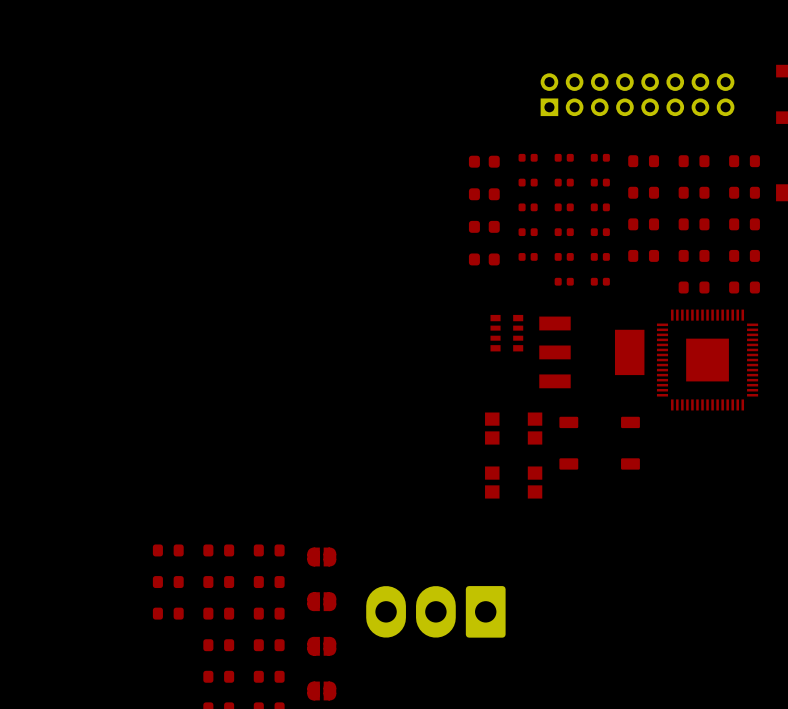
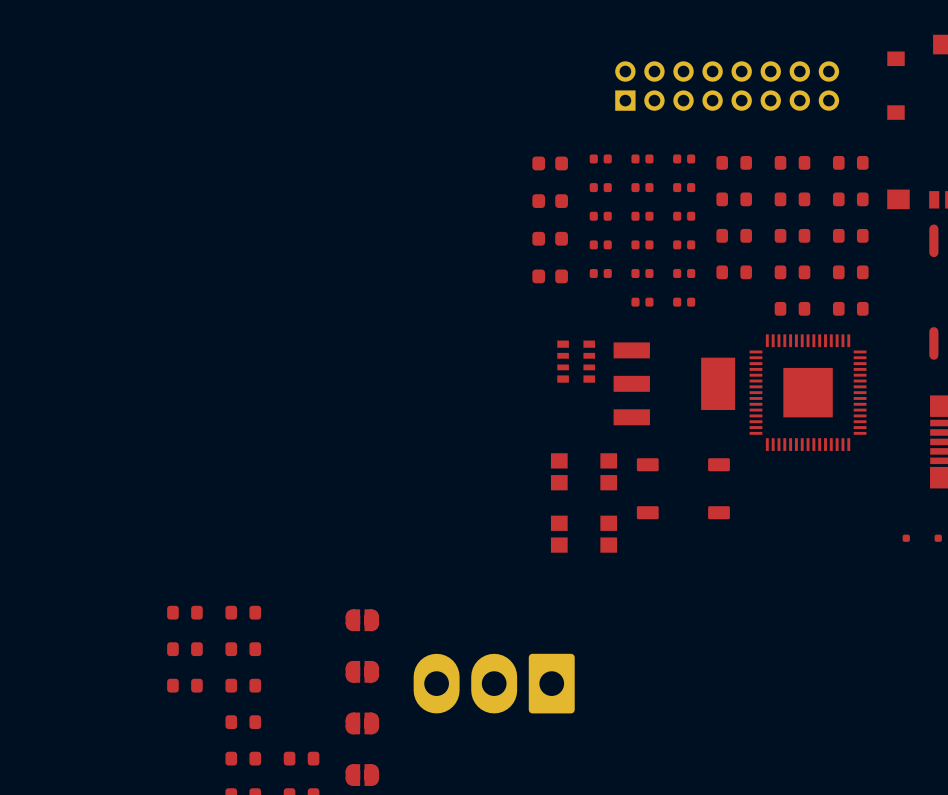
part: (269, 550) -> none
part: (269, 582) -> none
part: (269, 613) -> none
part: (269, 645) -> none

